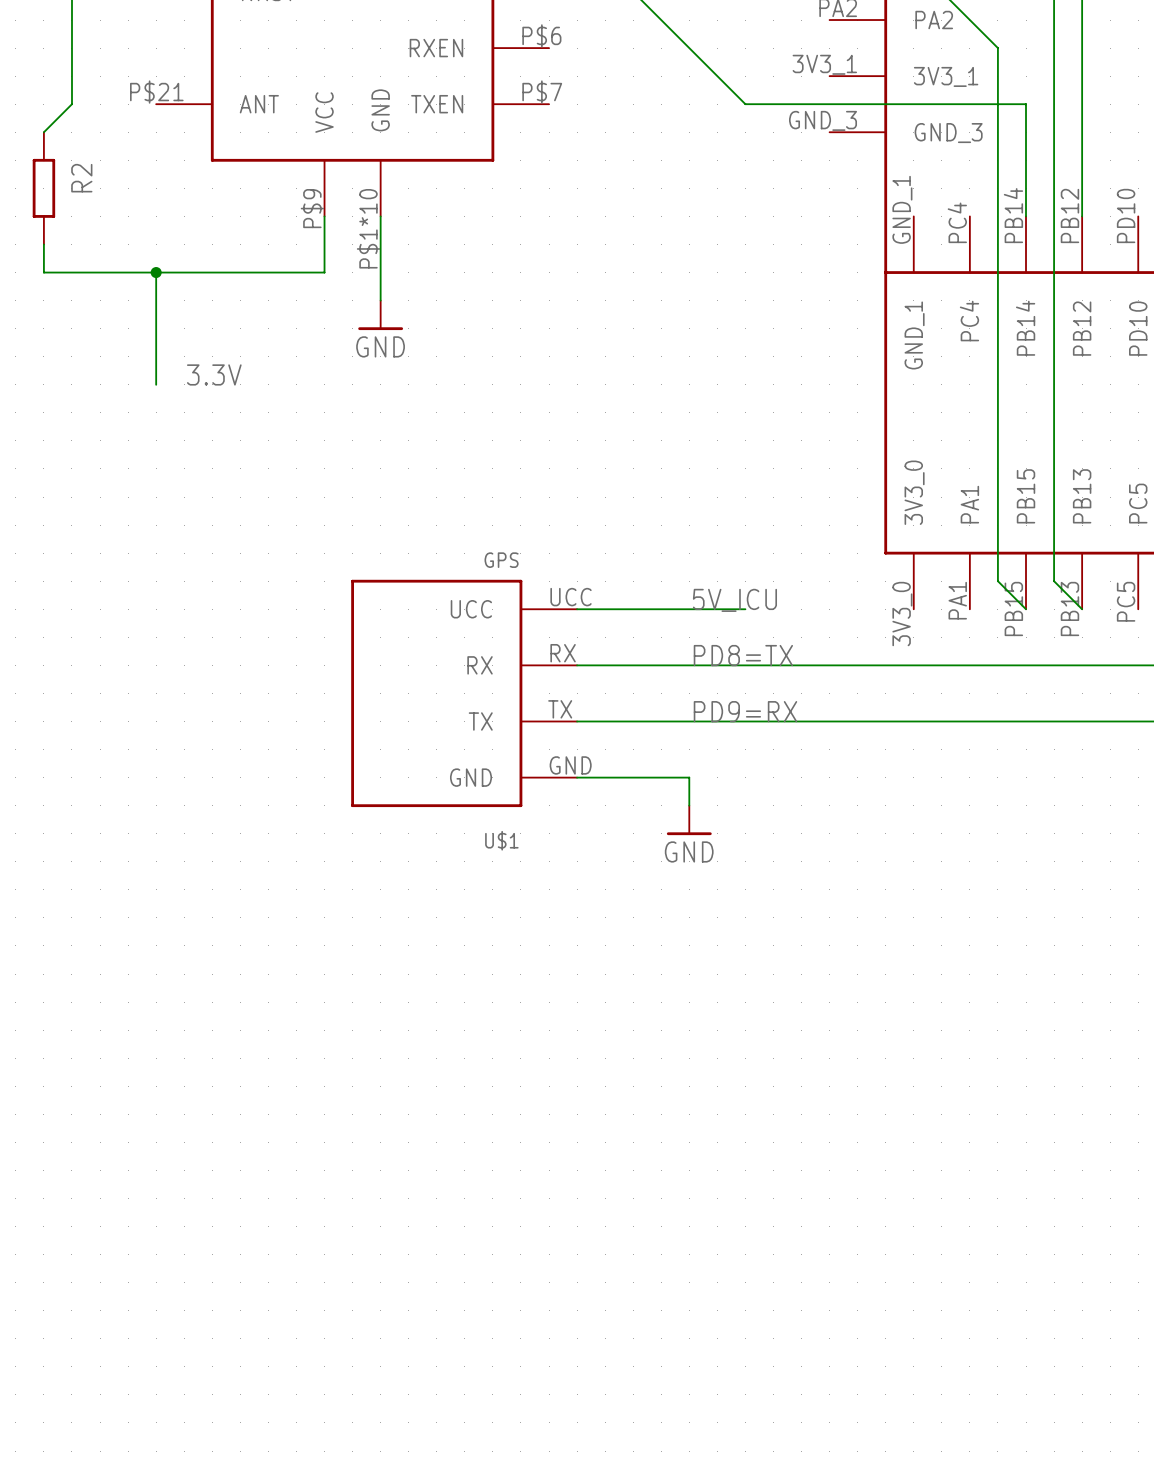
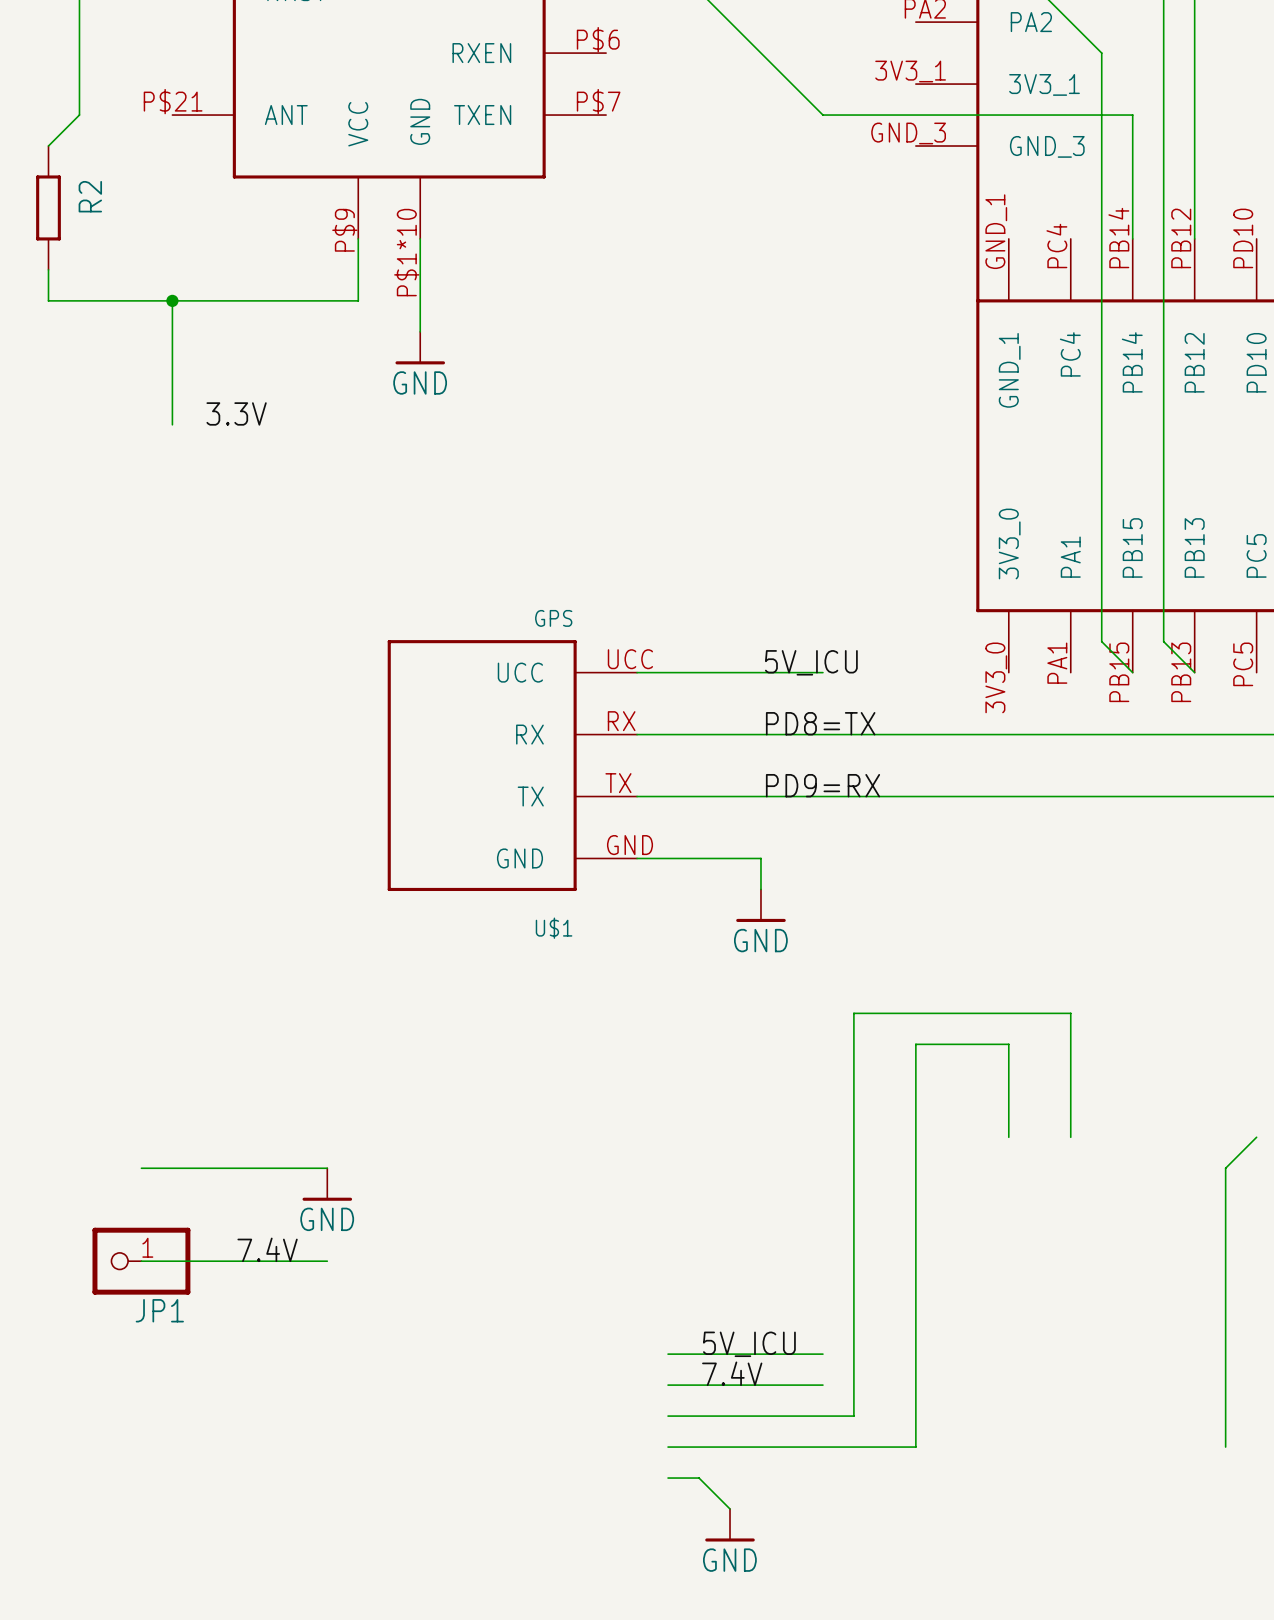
wire: none -> (1008, 1137) (1008, 1044) (915, 1044) (915, 1447) (668, 1447)
wire: none -> (1070, 1137) (1070, 1013) (853, 1013) (853, 1416) (668, 1416)
wire: none -> (1256, 1137) (1225, 1168) (1225, 1447)
wire: none -> (141, 1168) (327, 1168)
power symbol: none -> GND (327, 1184)
label: none -> 7.4V (267, 1249)
wire: none -> (141, 1261) (327, 1261)
JP1: none -> (141, 1261)
label: none -> 5V_ICU (749, 1344)
wire: none -> (668, 1354) (822, 1354)
label: none -> 7.4V (732, 1373)
wire: none -> (668, 1385) (822, 1385)
wire: none -> (668, 1478) (699, 1478) (730, 1509)
power symbol: none -> GND (730, 1525)

